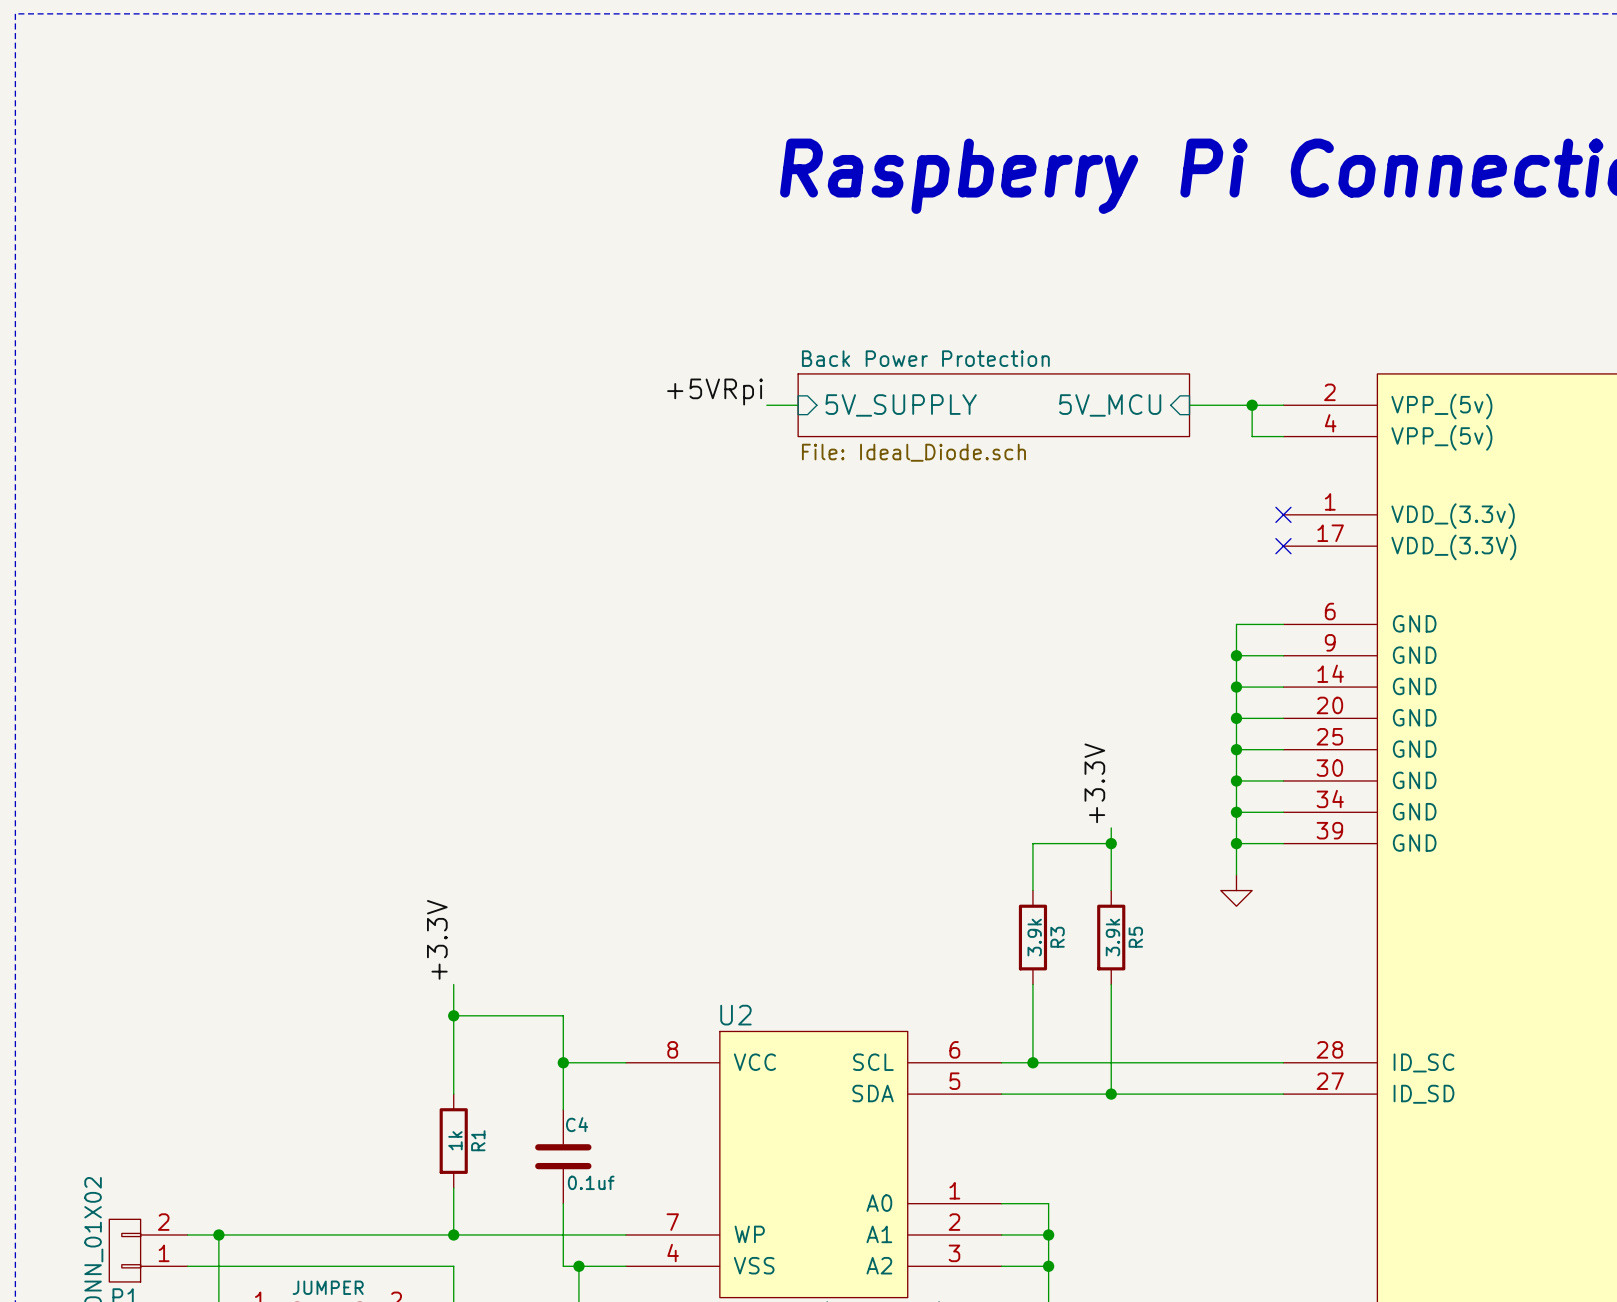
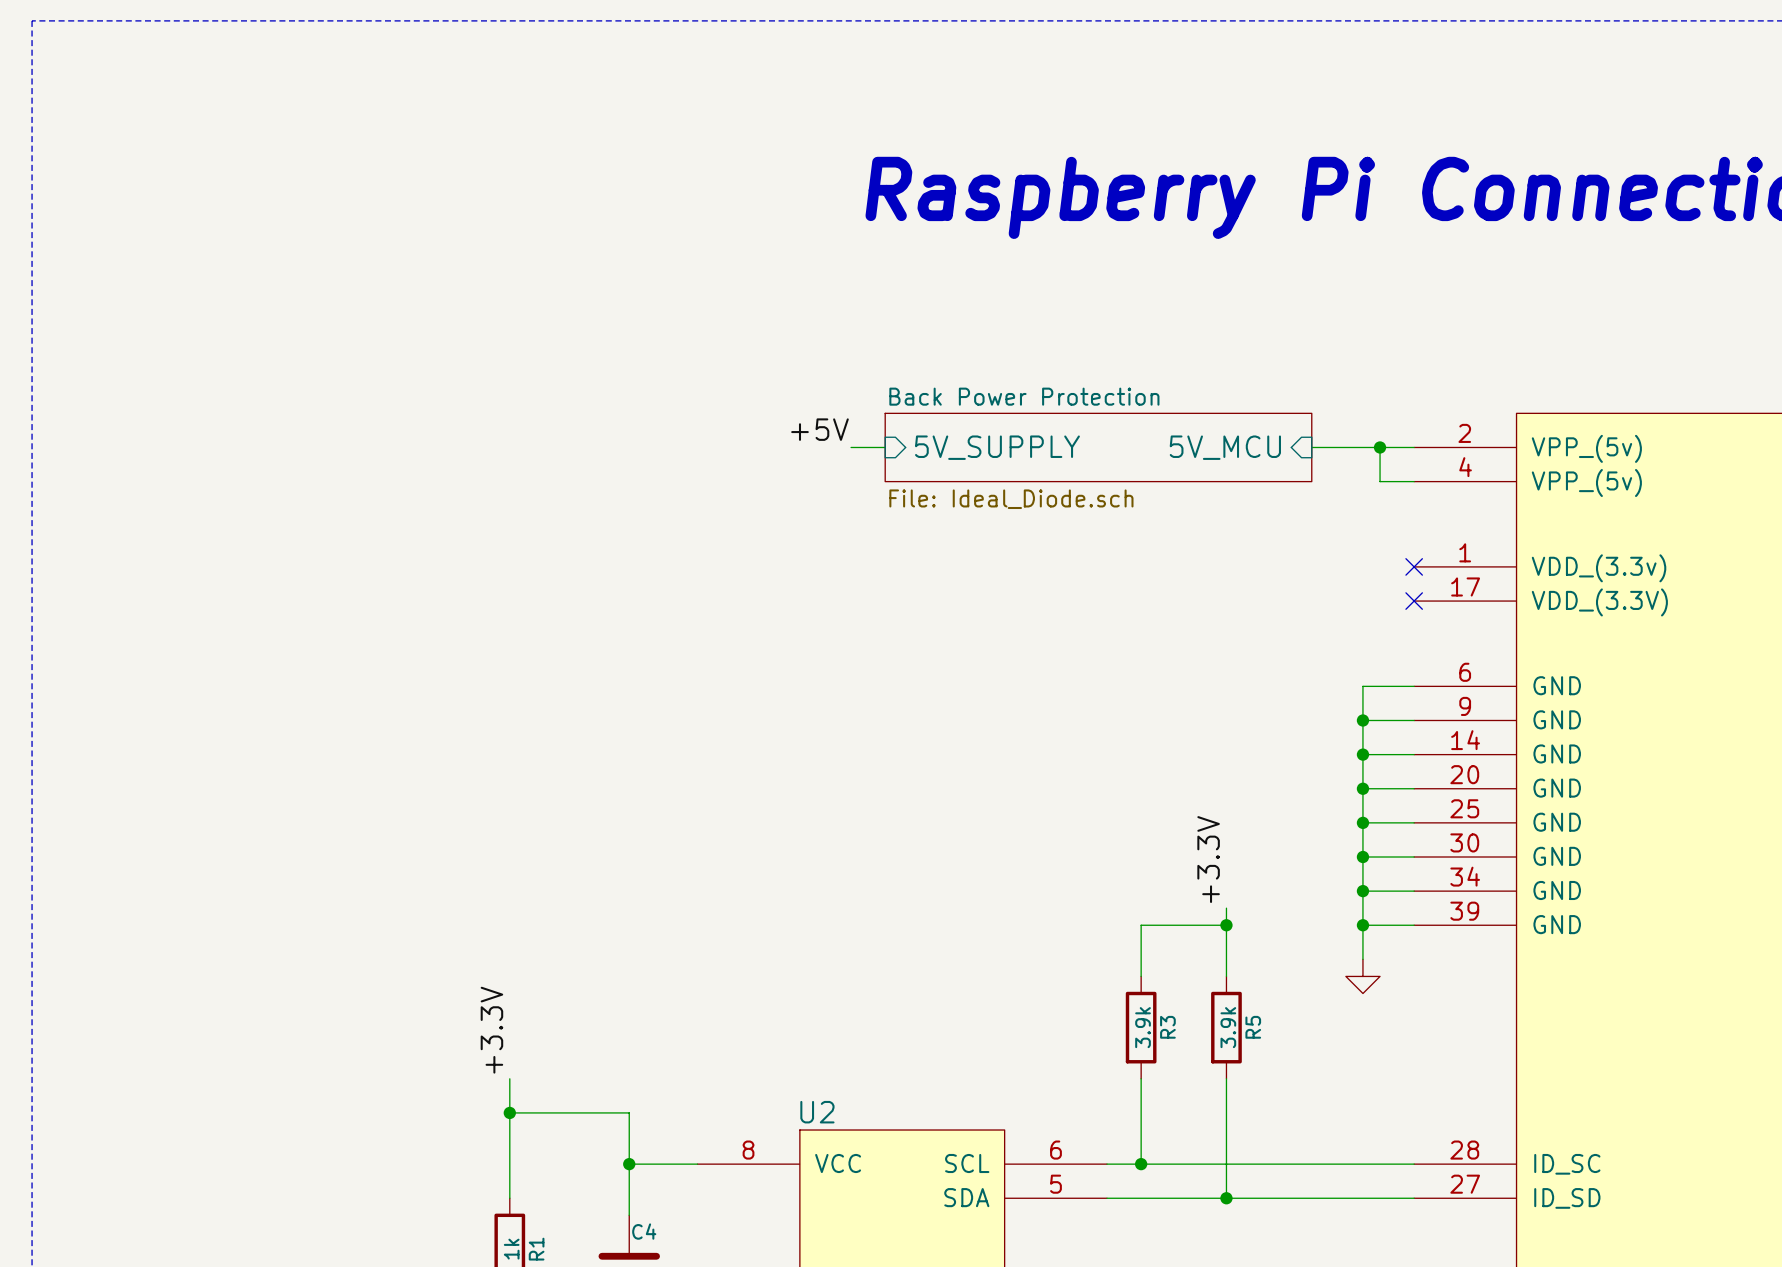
label: +5VRpi (715, 392) -> +5V (819, 429)

